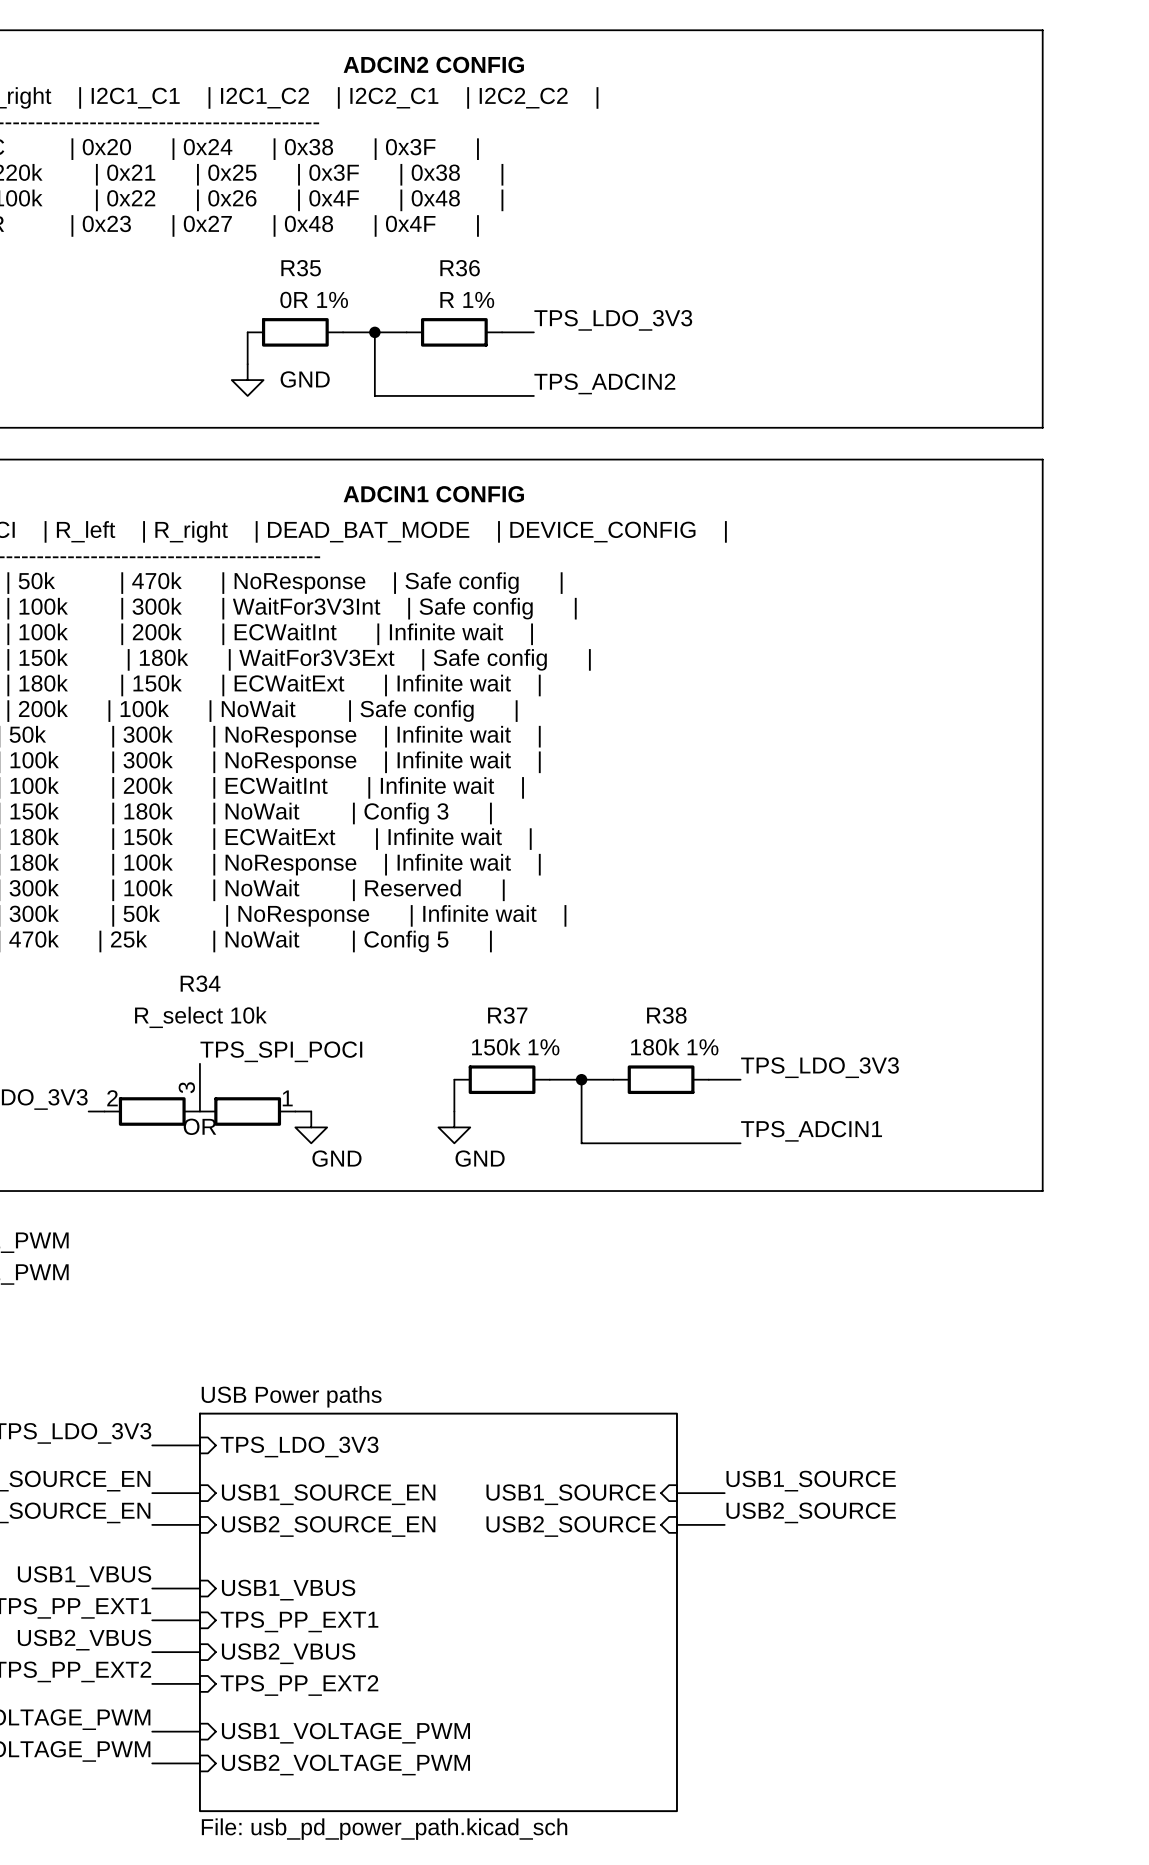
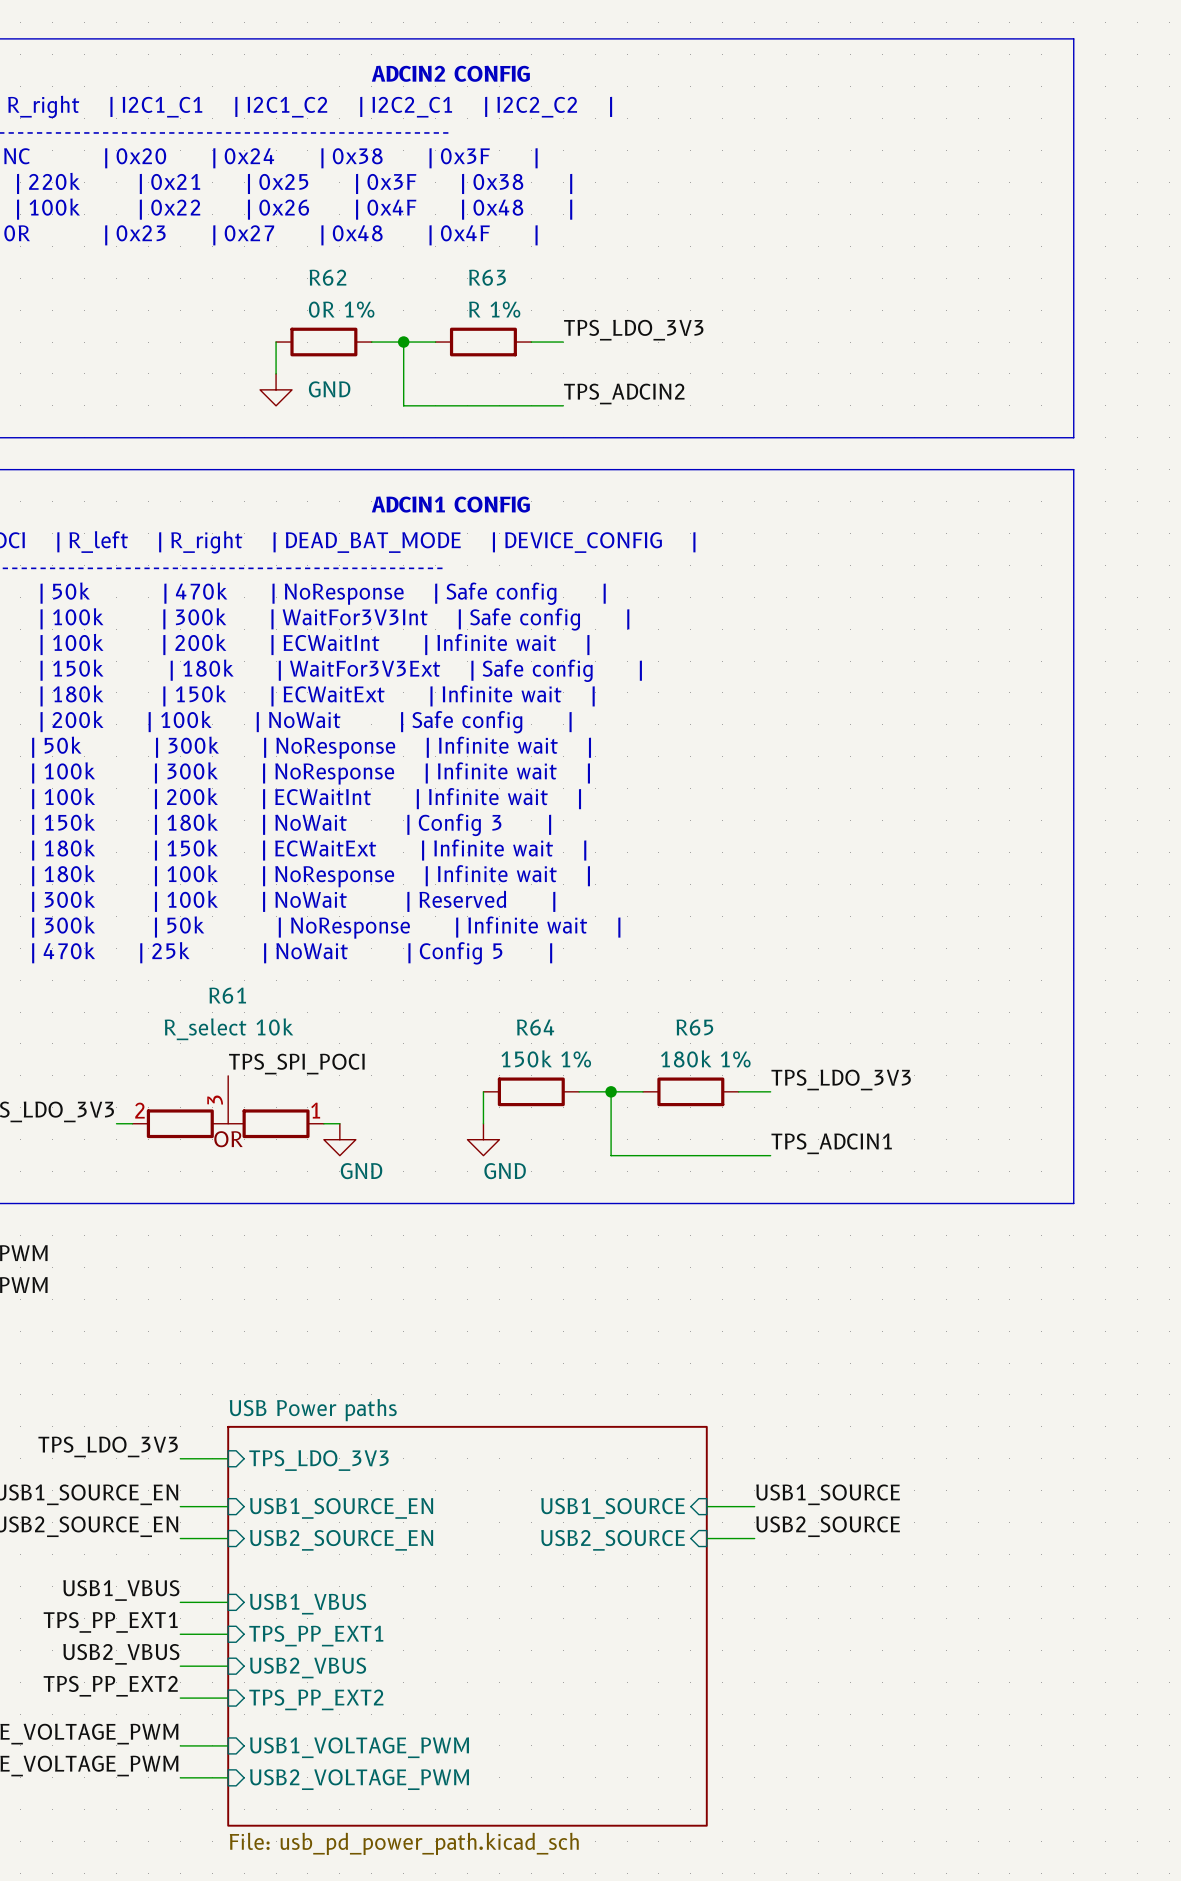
R35 name: R35 (301, 268) -> R62 (327, 277)
R36 name: R36 (460, 268) -> R63 (487, 277)
R34 name: R34 (200, 983) -> R61 (227, 995)
R37 name: R37 (507, 1015) -> R64 (535, 1027)
R38 name: R38 (666, 1015) -> R65 (694, 1027)

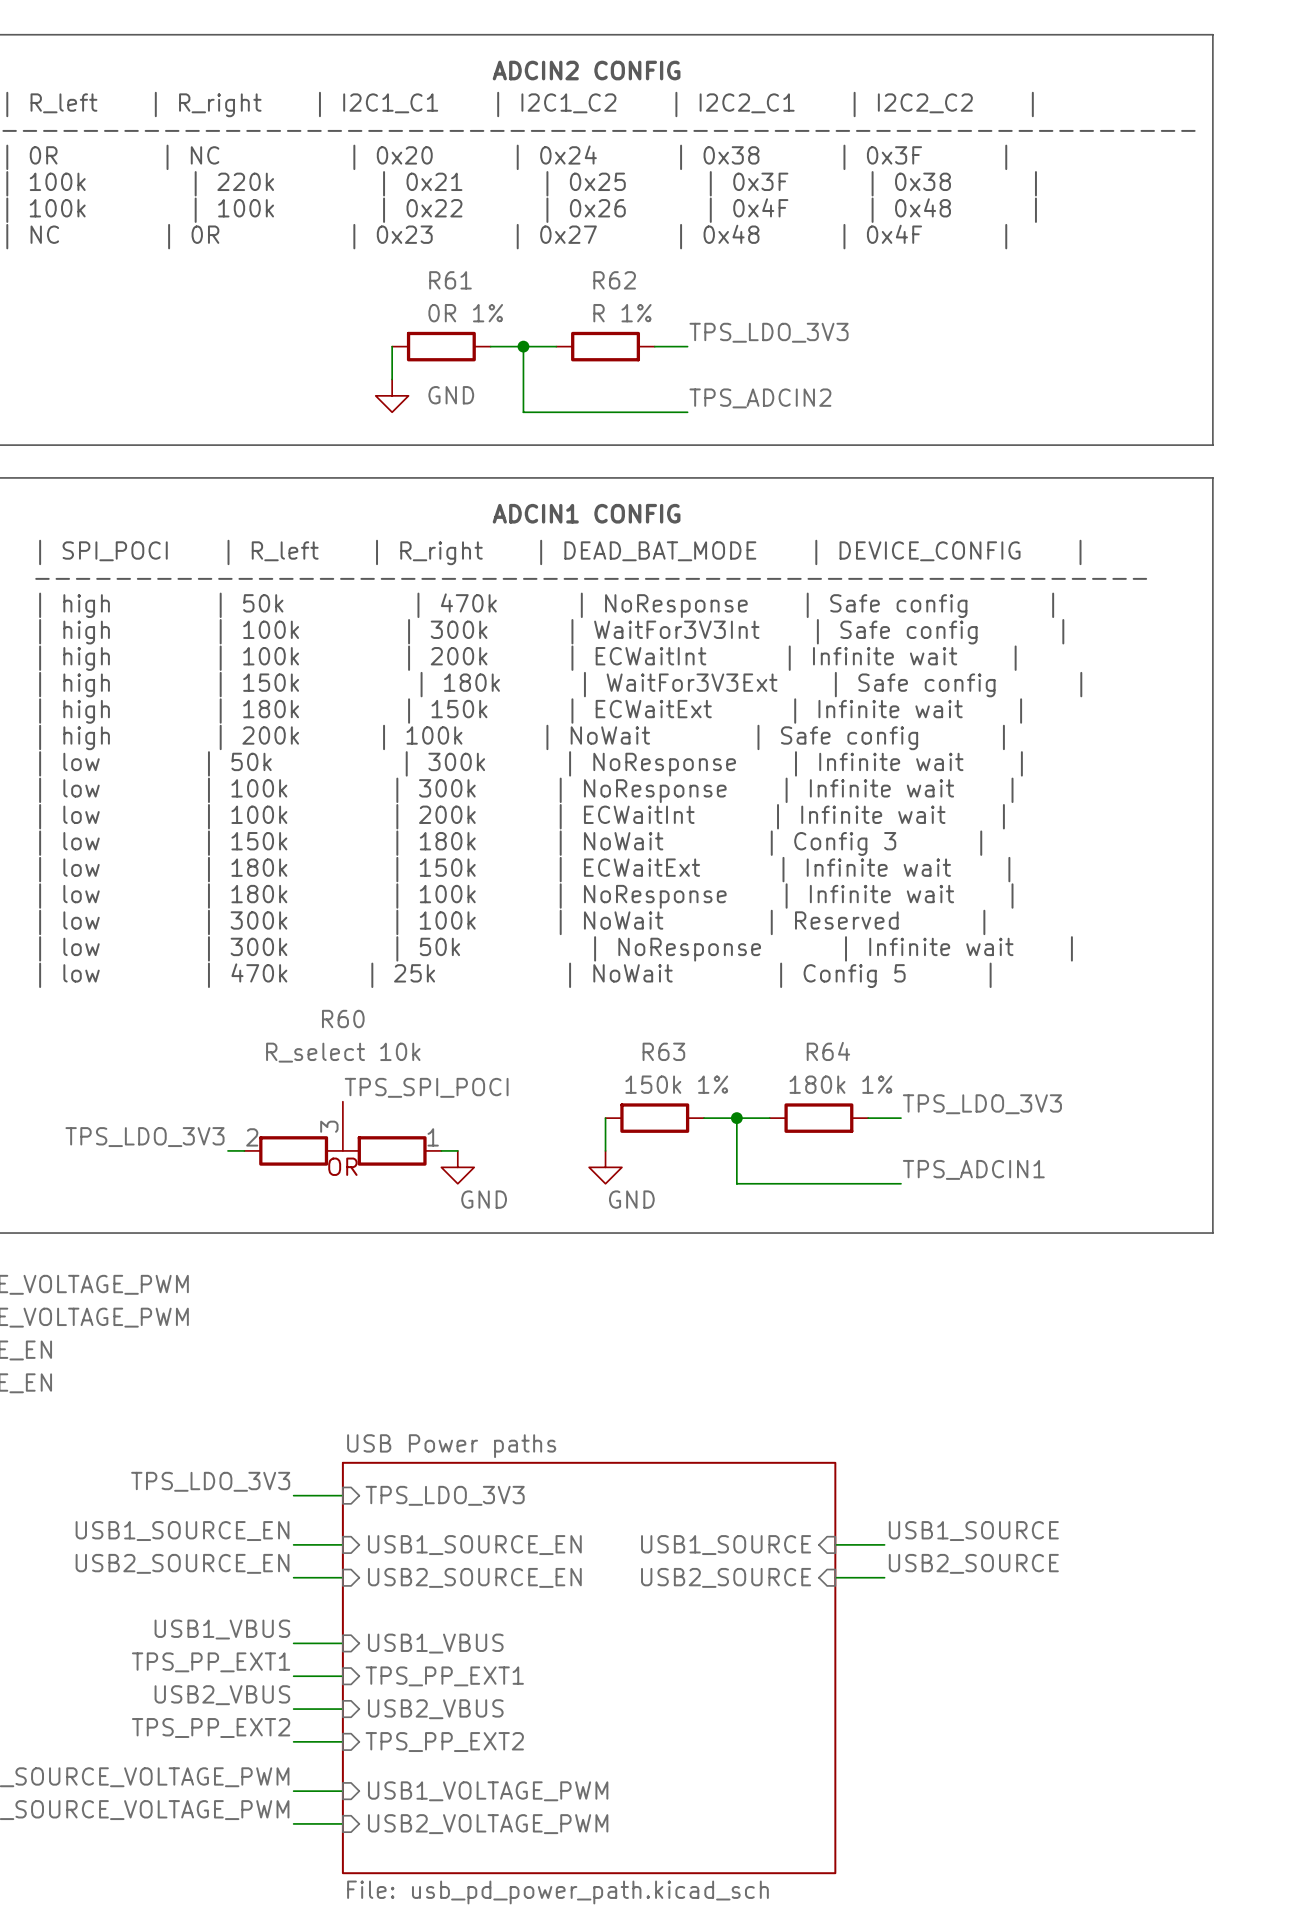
R62 name: R62 (327, 277) -> R61 (450, 280)
R63 name: R63 (487, 277) -> R62 (614, 280)
R61 name: R61 (227, 995) -> R60 (343, 1019)
R64 name: R64 (535, 1027) -> R63 (663, 1051)
R65 name: R65 (694, 1027) -> R64 (828, 1051)

